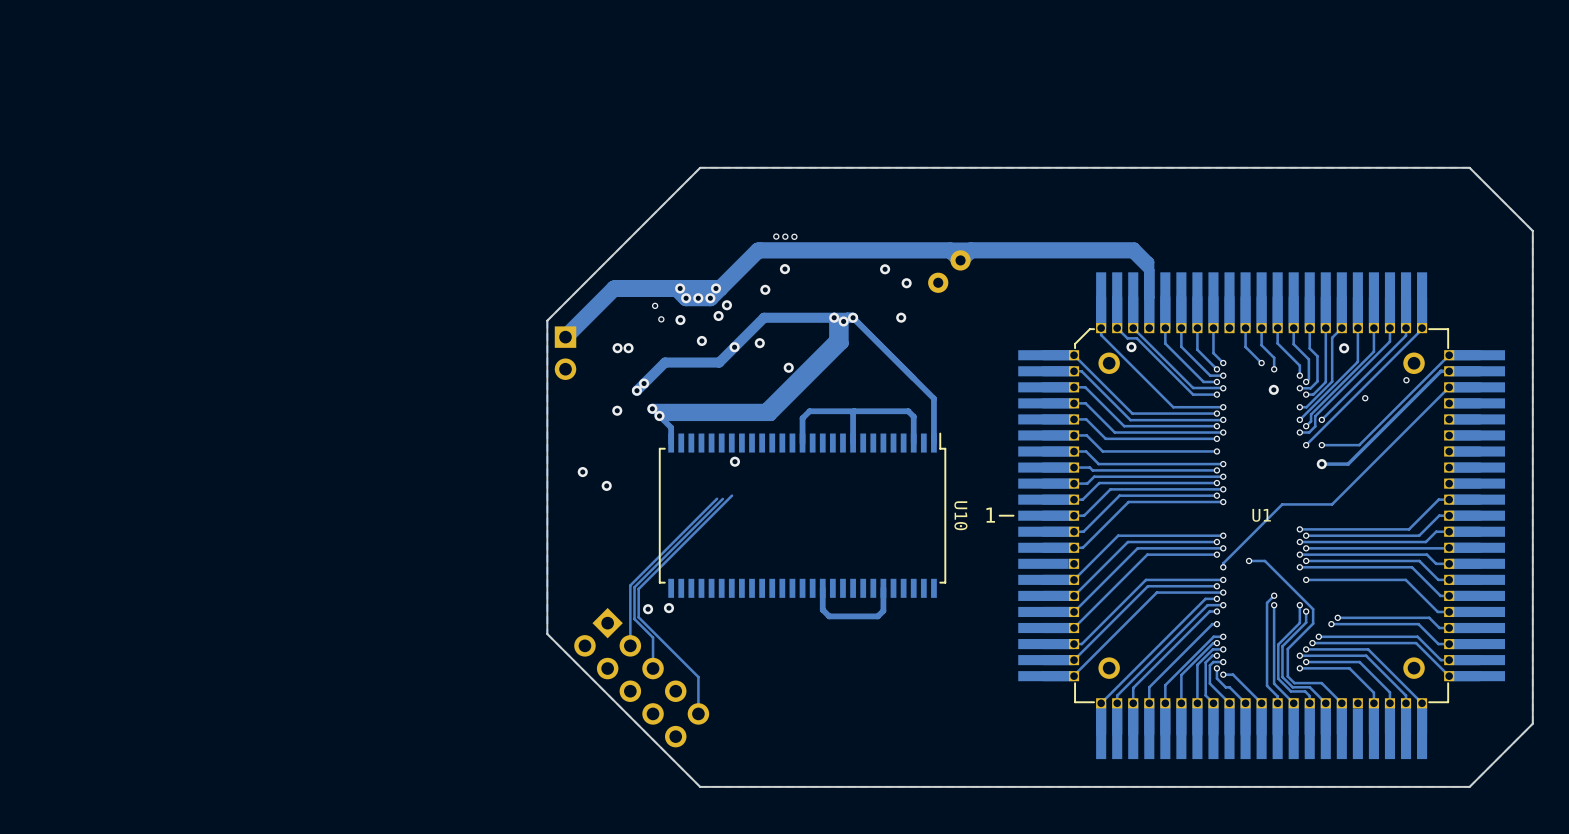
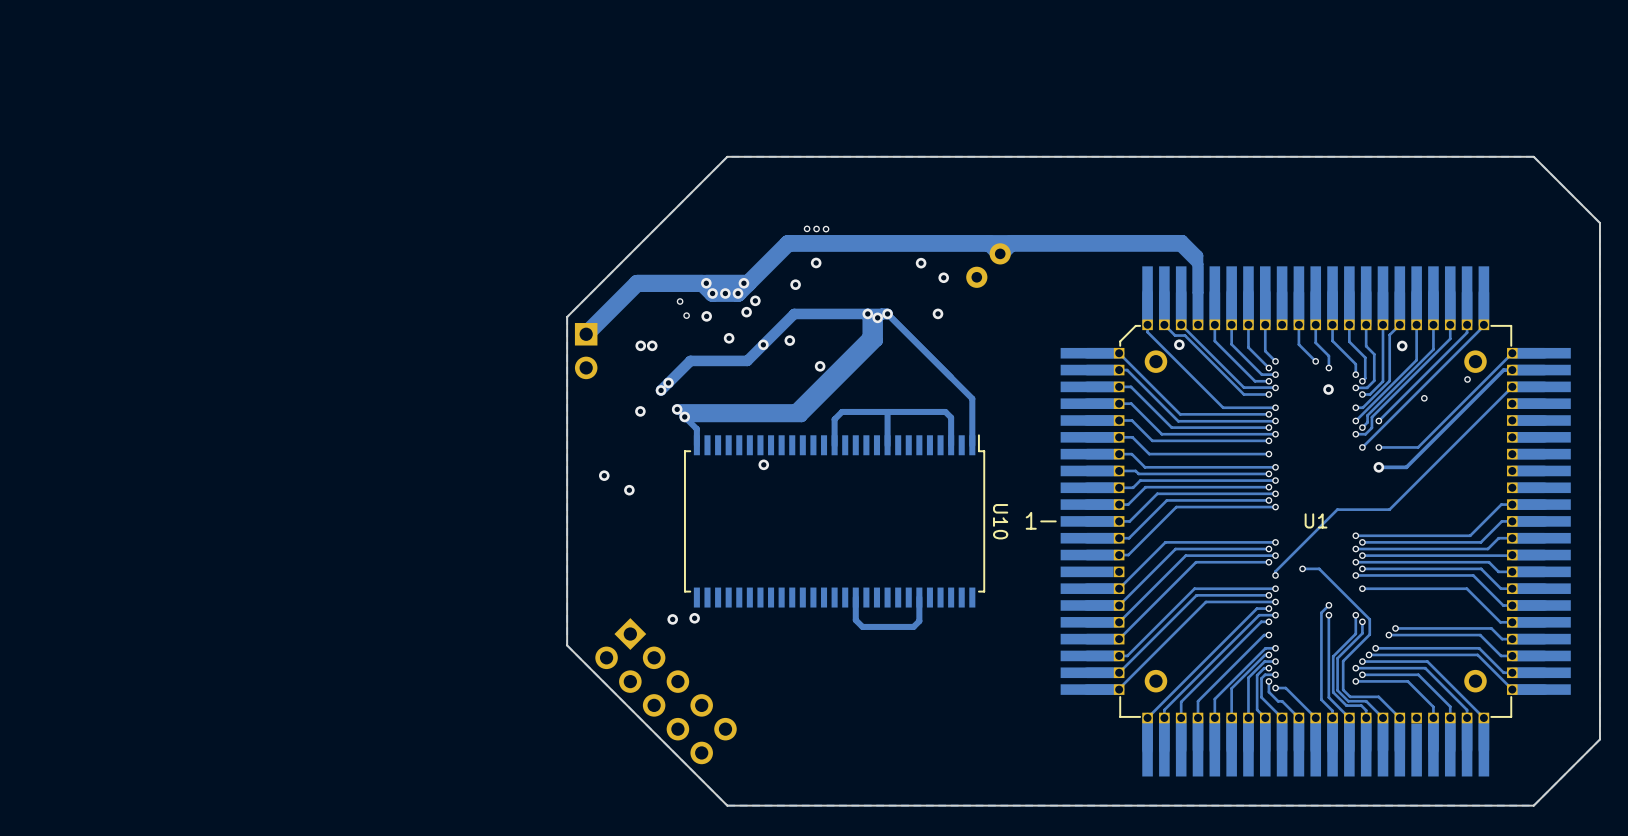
track: (732, 495) (638, 588) (638, 617) (698, 677) (698, 713) -> none
track: (717, 498) (630, 585) (630, 645) -> none
track: (722, 498) (634, 587) (634, 619) (653, 637) (653, 668) -> none

